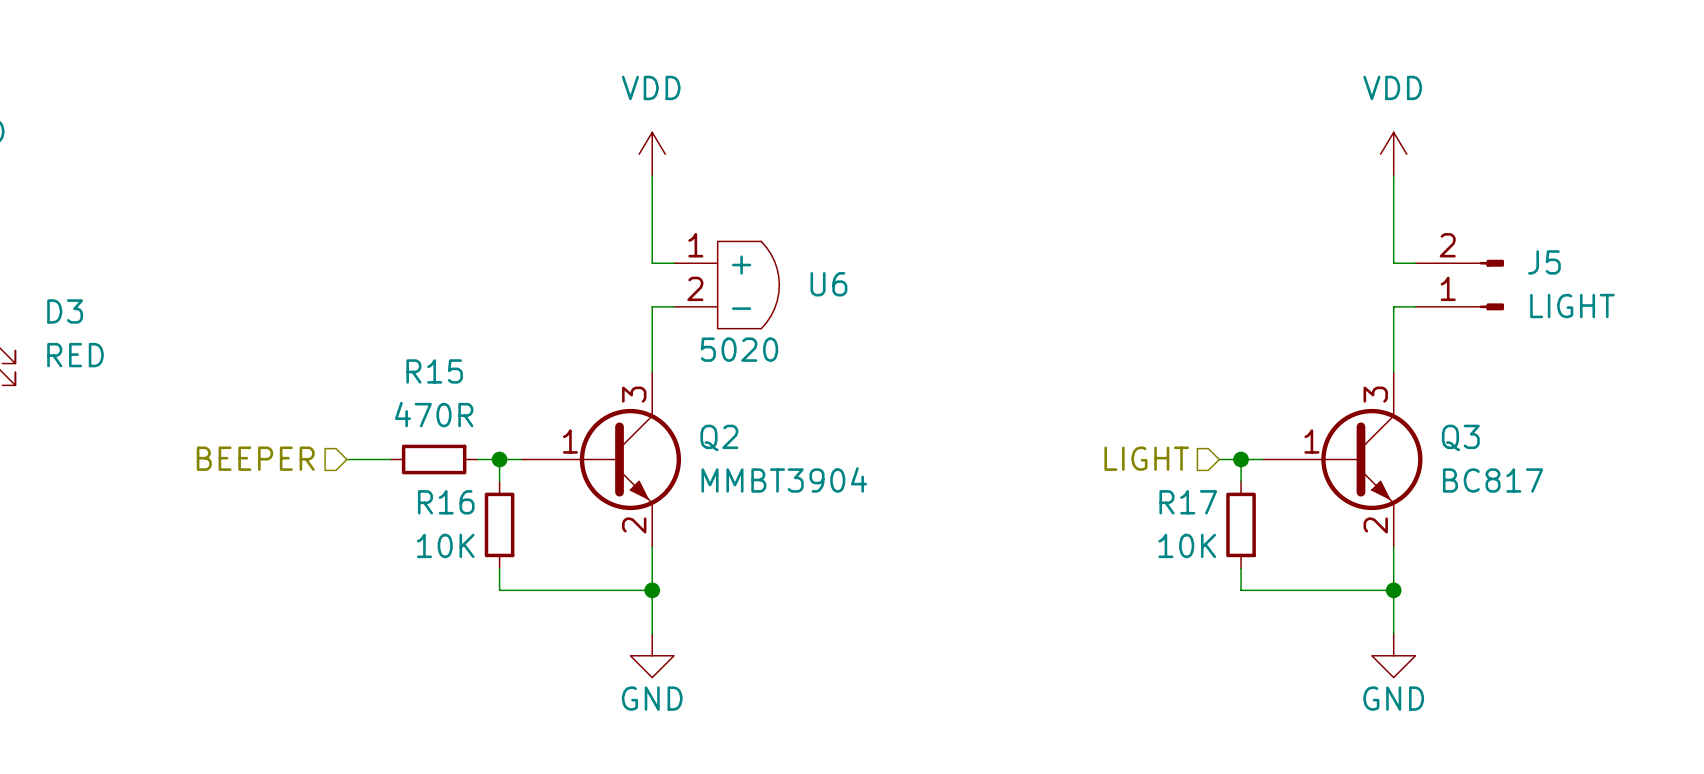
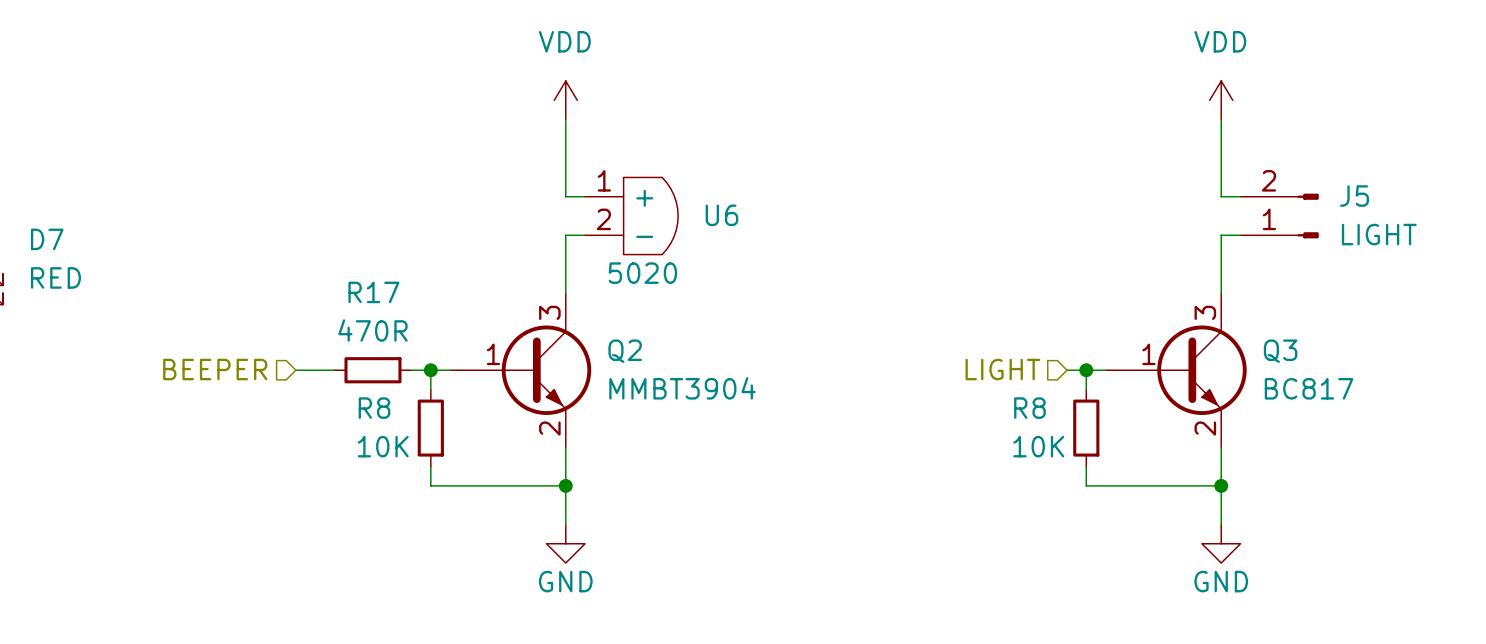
D3 name: D3 (65, 311) -> D7 (47, 239)
R15 name: R15 (434, 371) -> R17 (373, 292)
R16 name: R16 (446, 502) -> R8 (374, 408)
R17 name: R17 (1188, 502) -> R8 (1029, 408)

